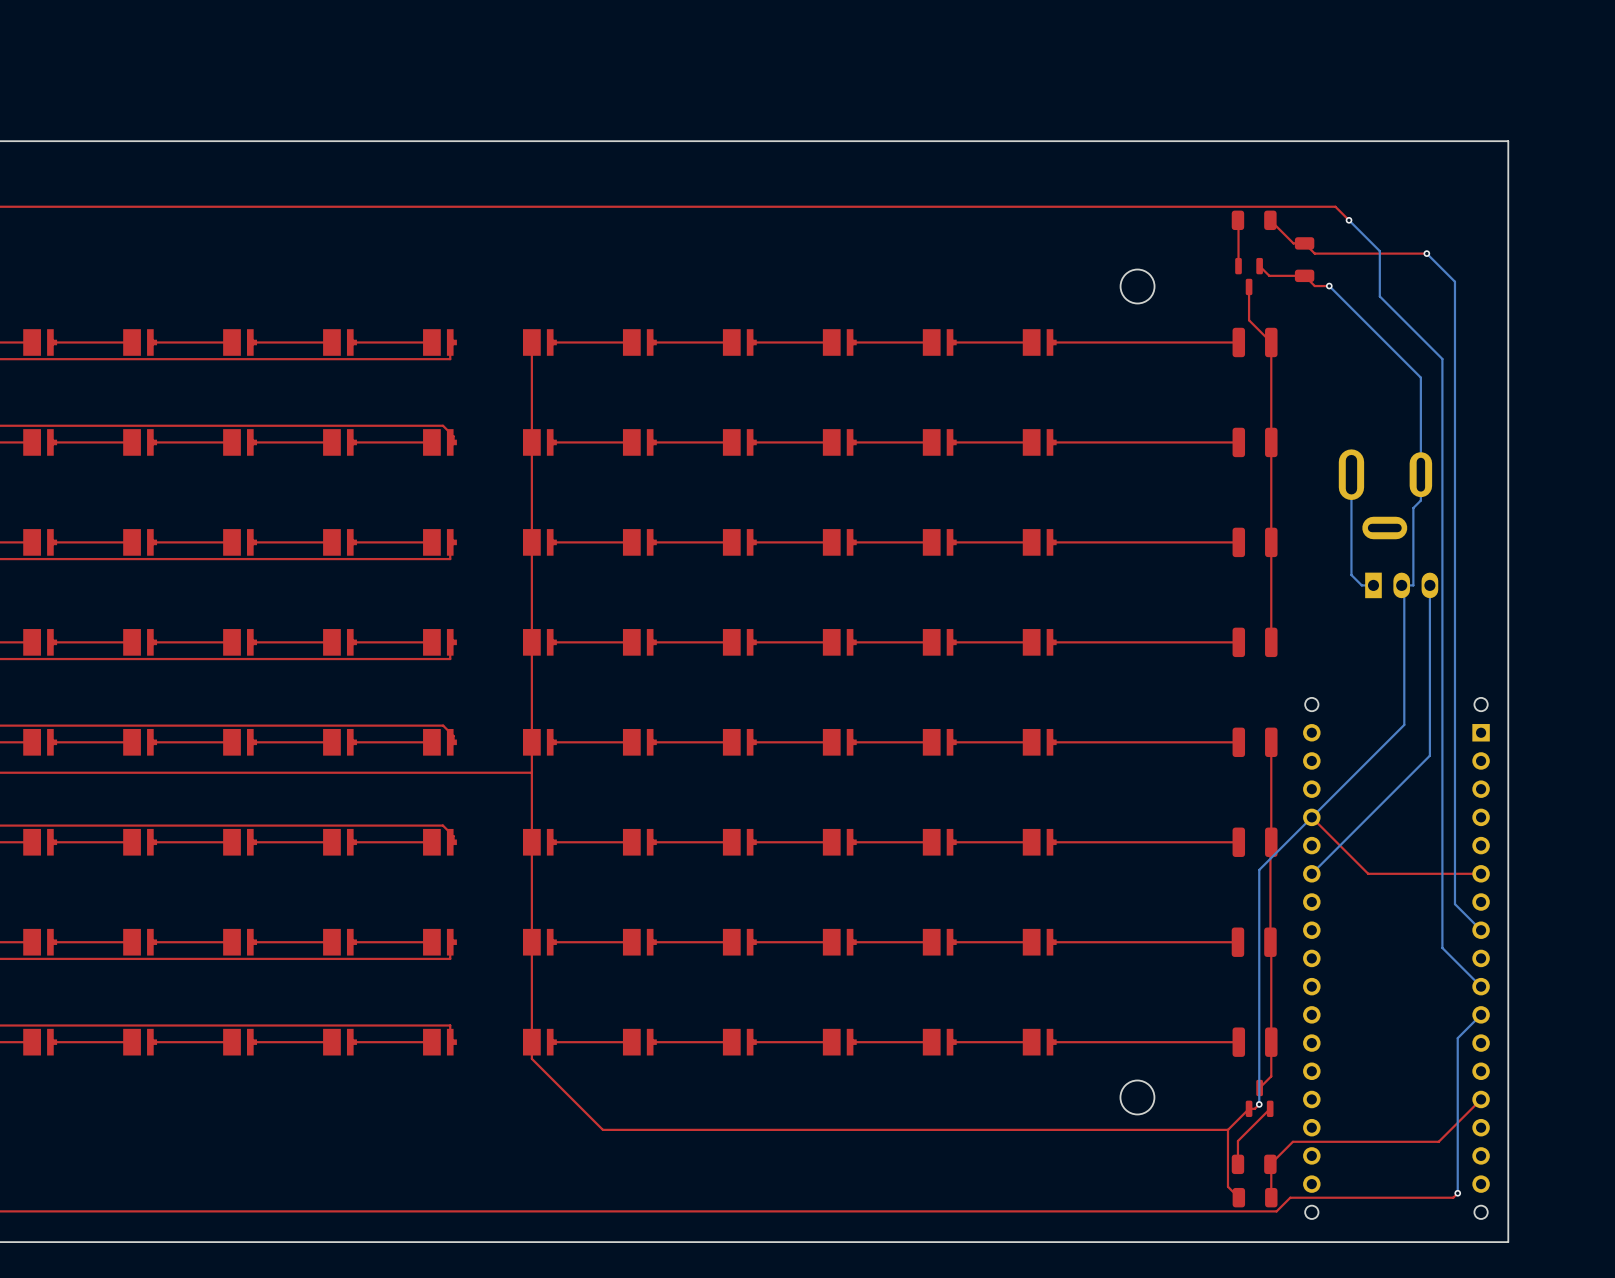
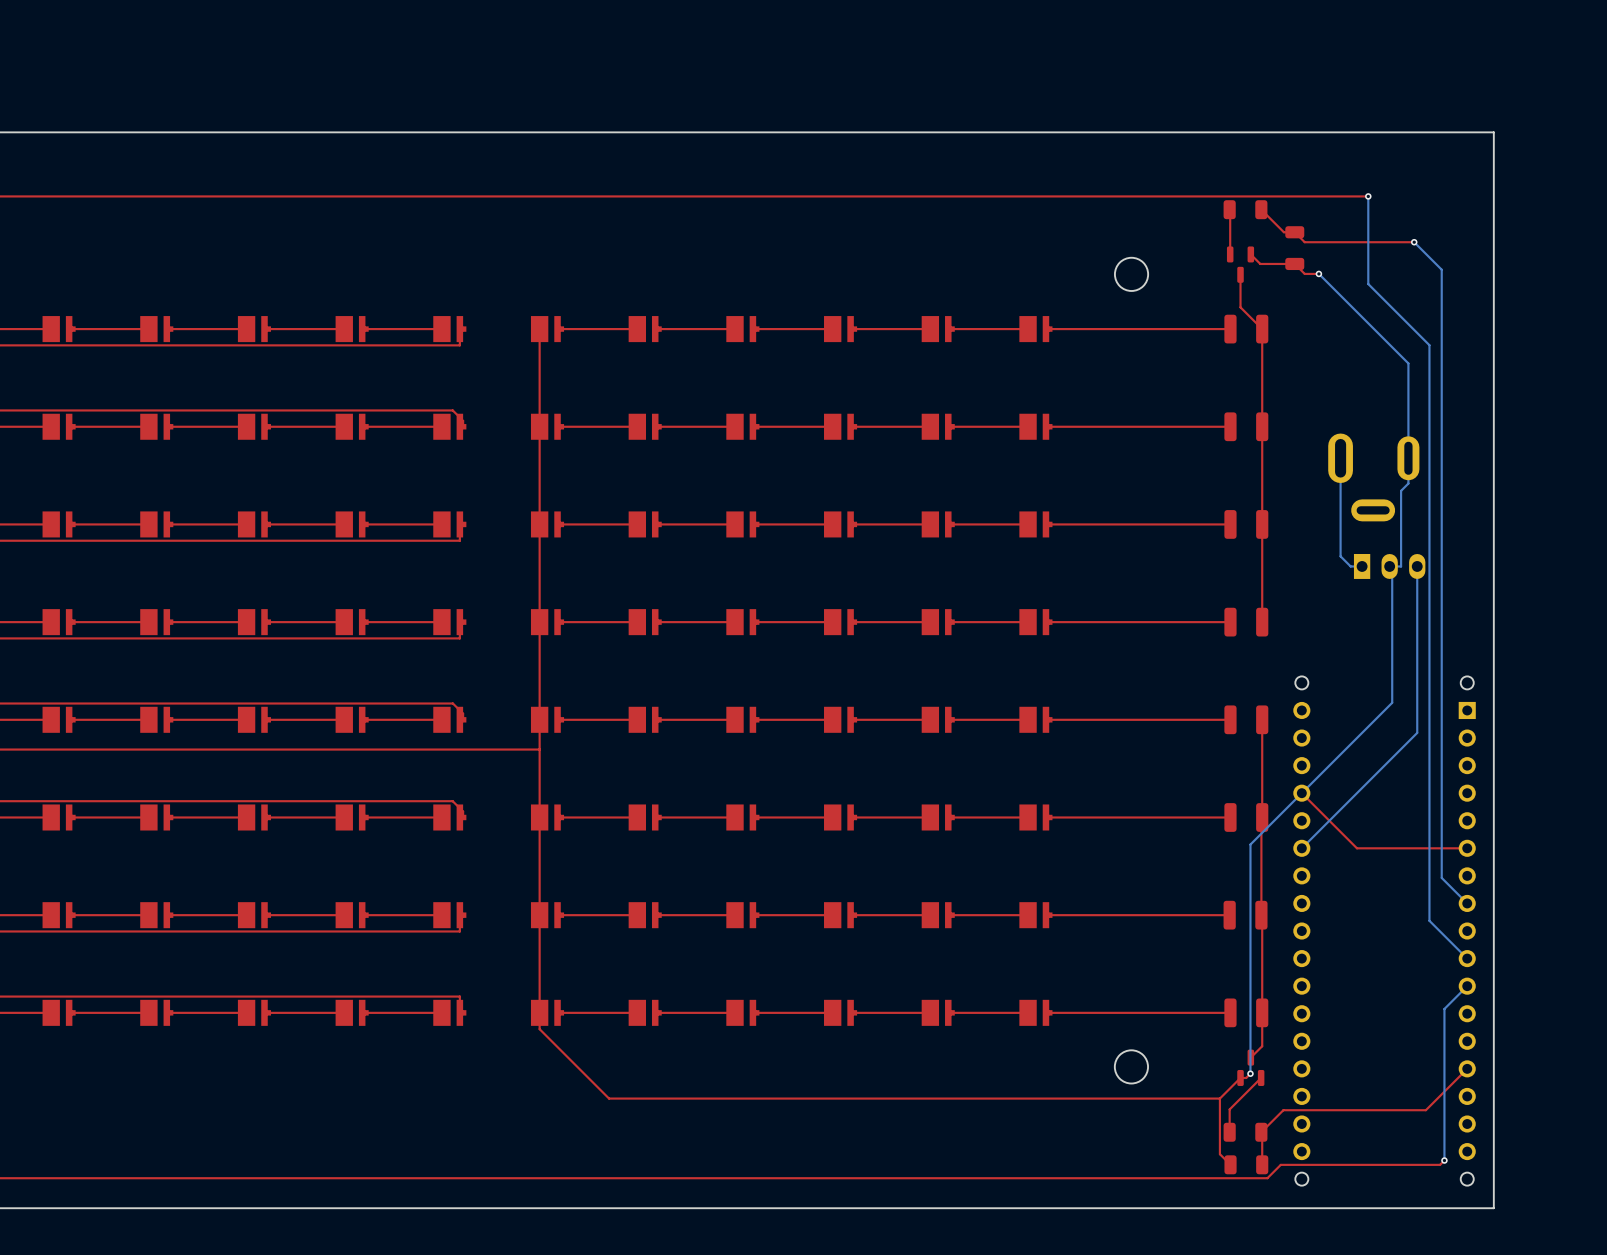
top track: (1335, 206) (1349, 220) -> (1324, 196) (1368, 196)
bottom track: (1349, 220) (1379, 251) -> (1368, 196) (1368, 239)
via position: (1349, 220) -> (1368, 196)

